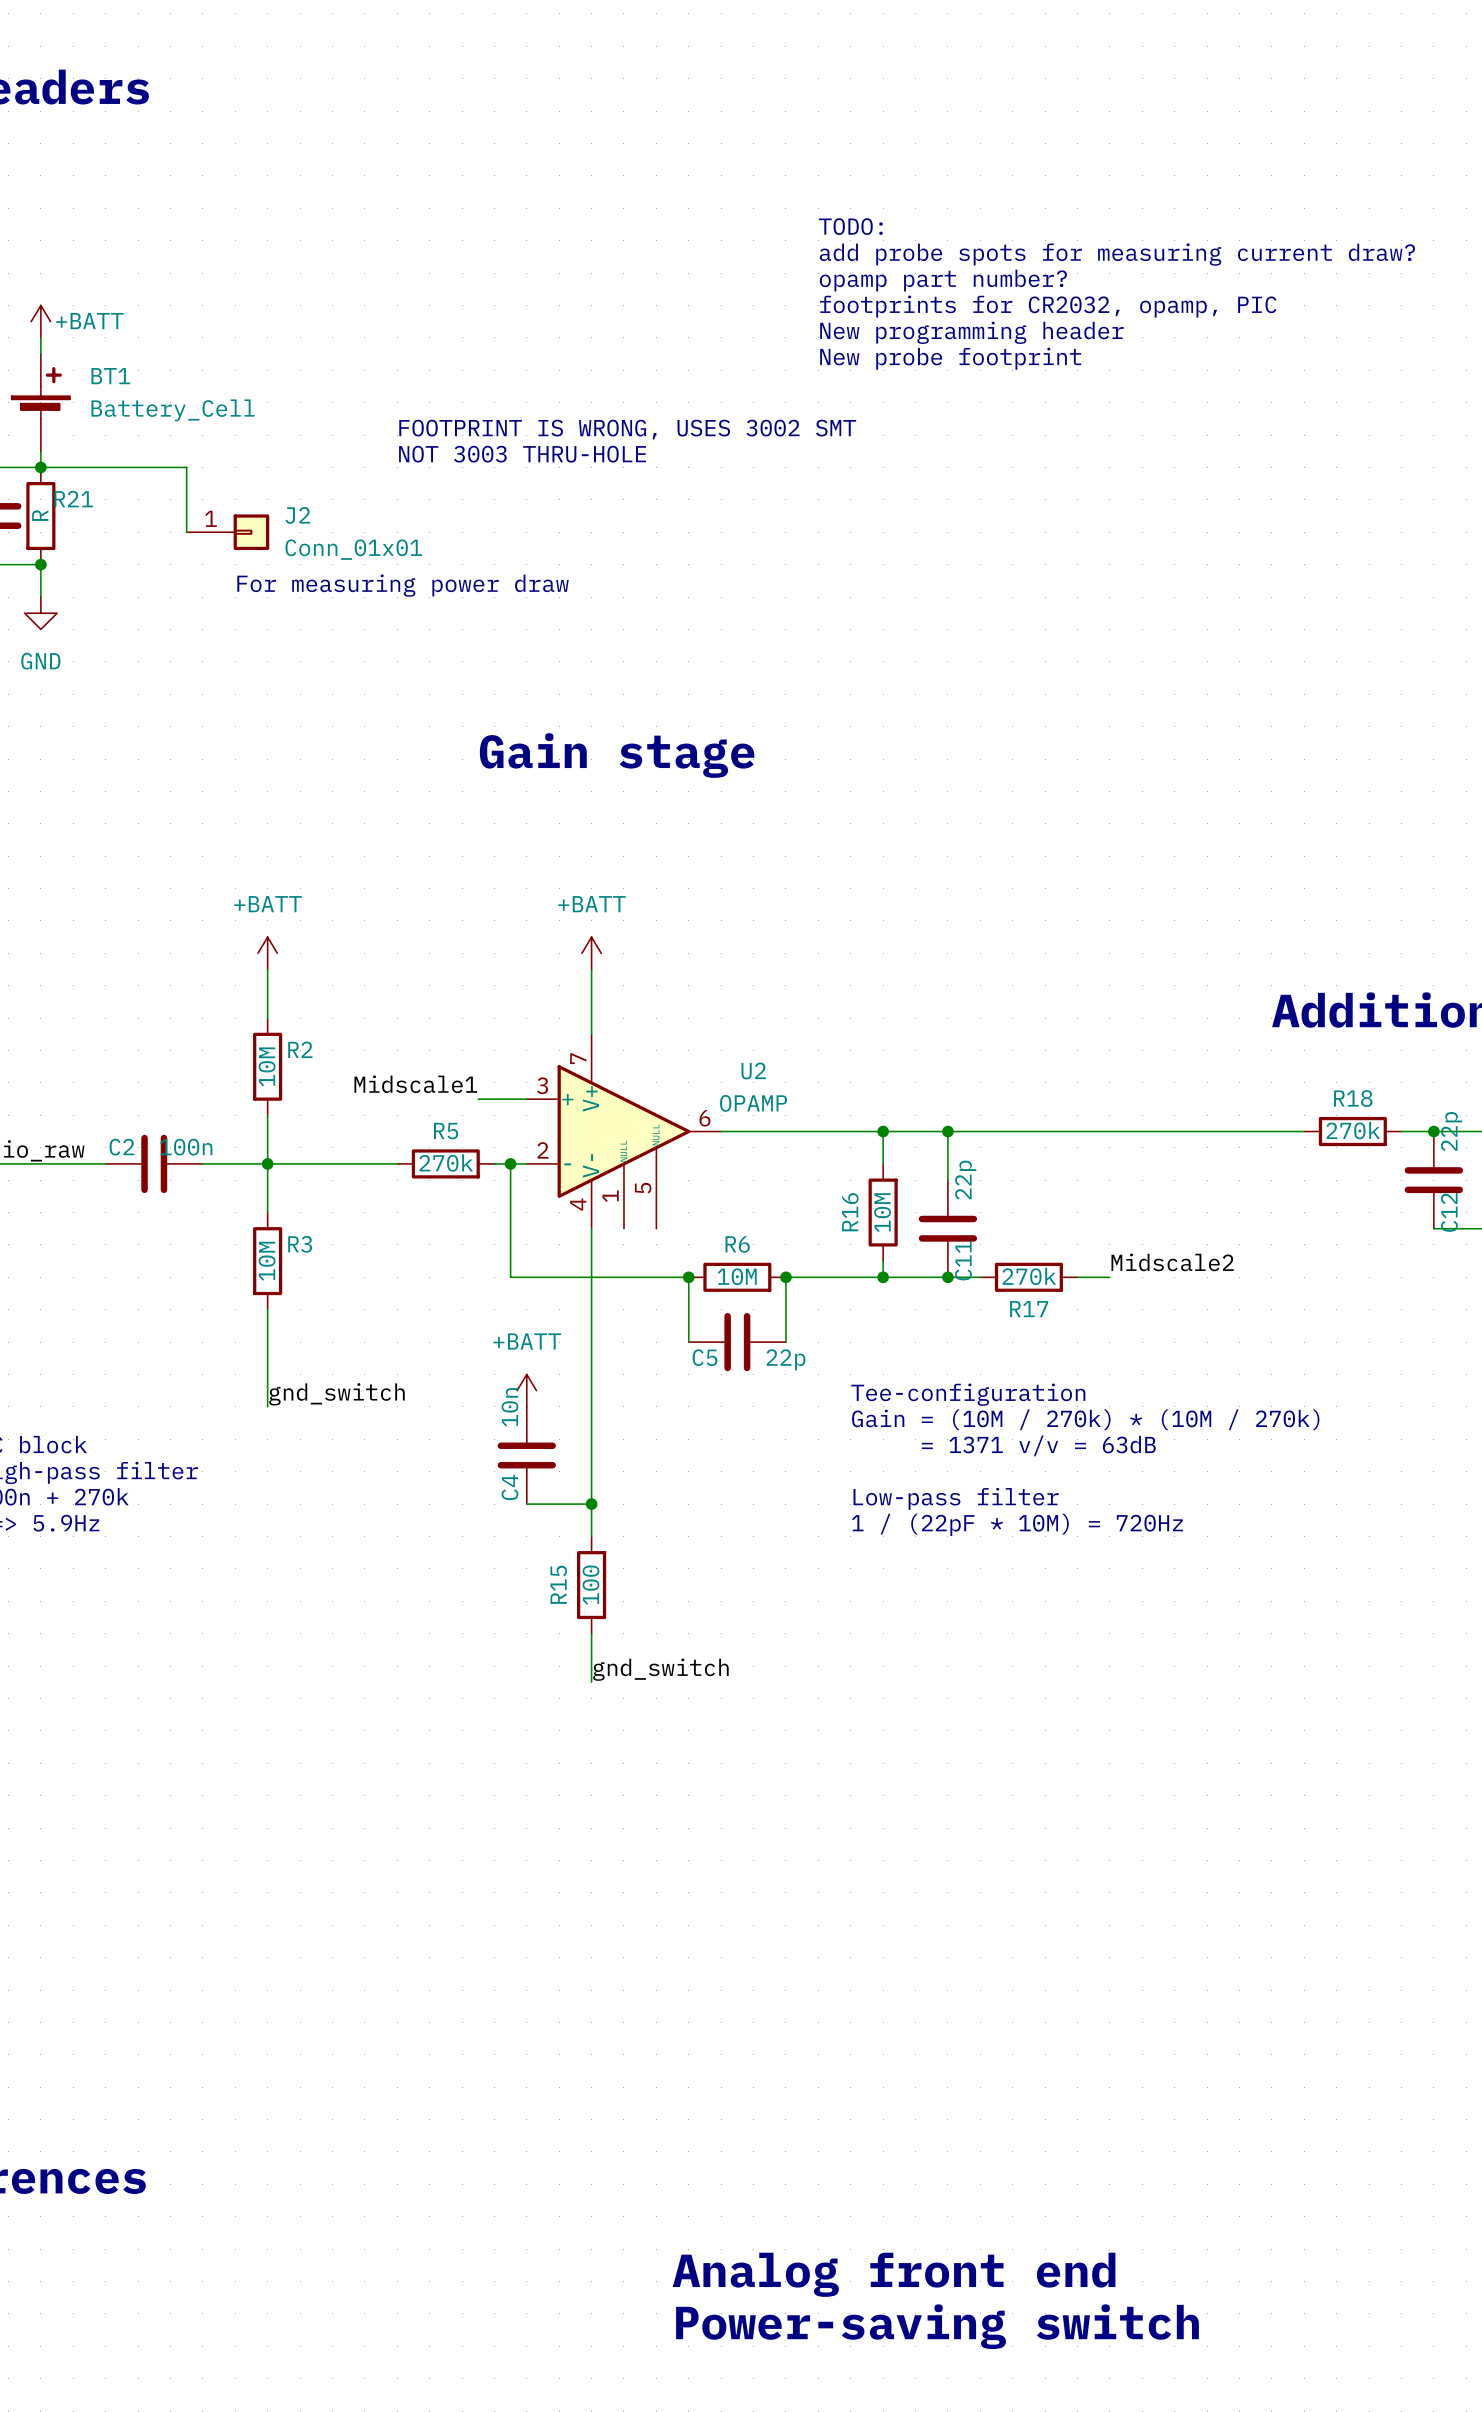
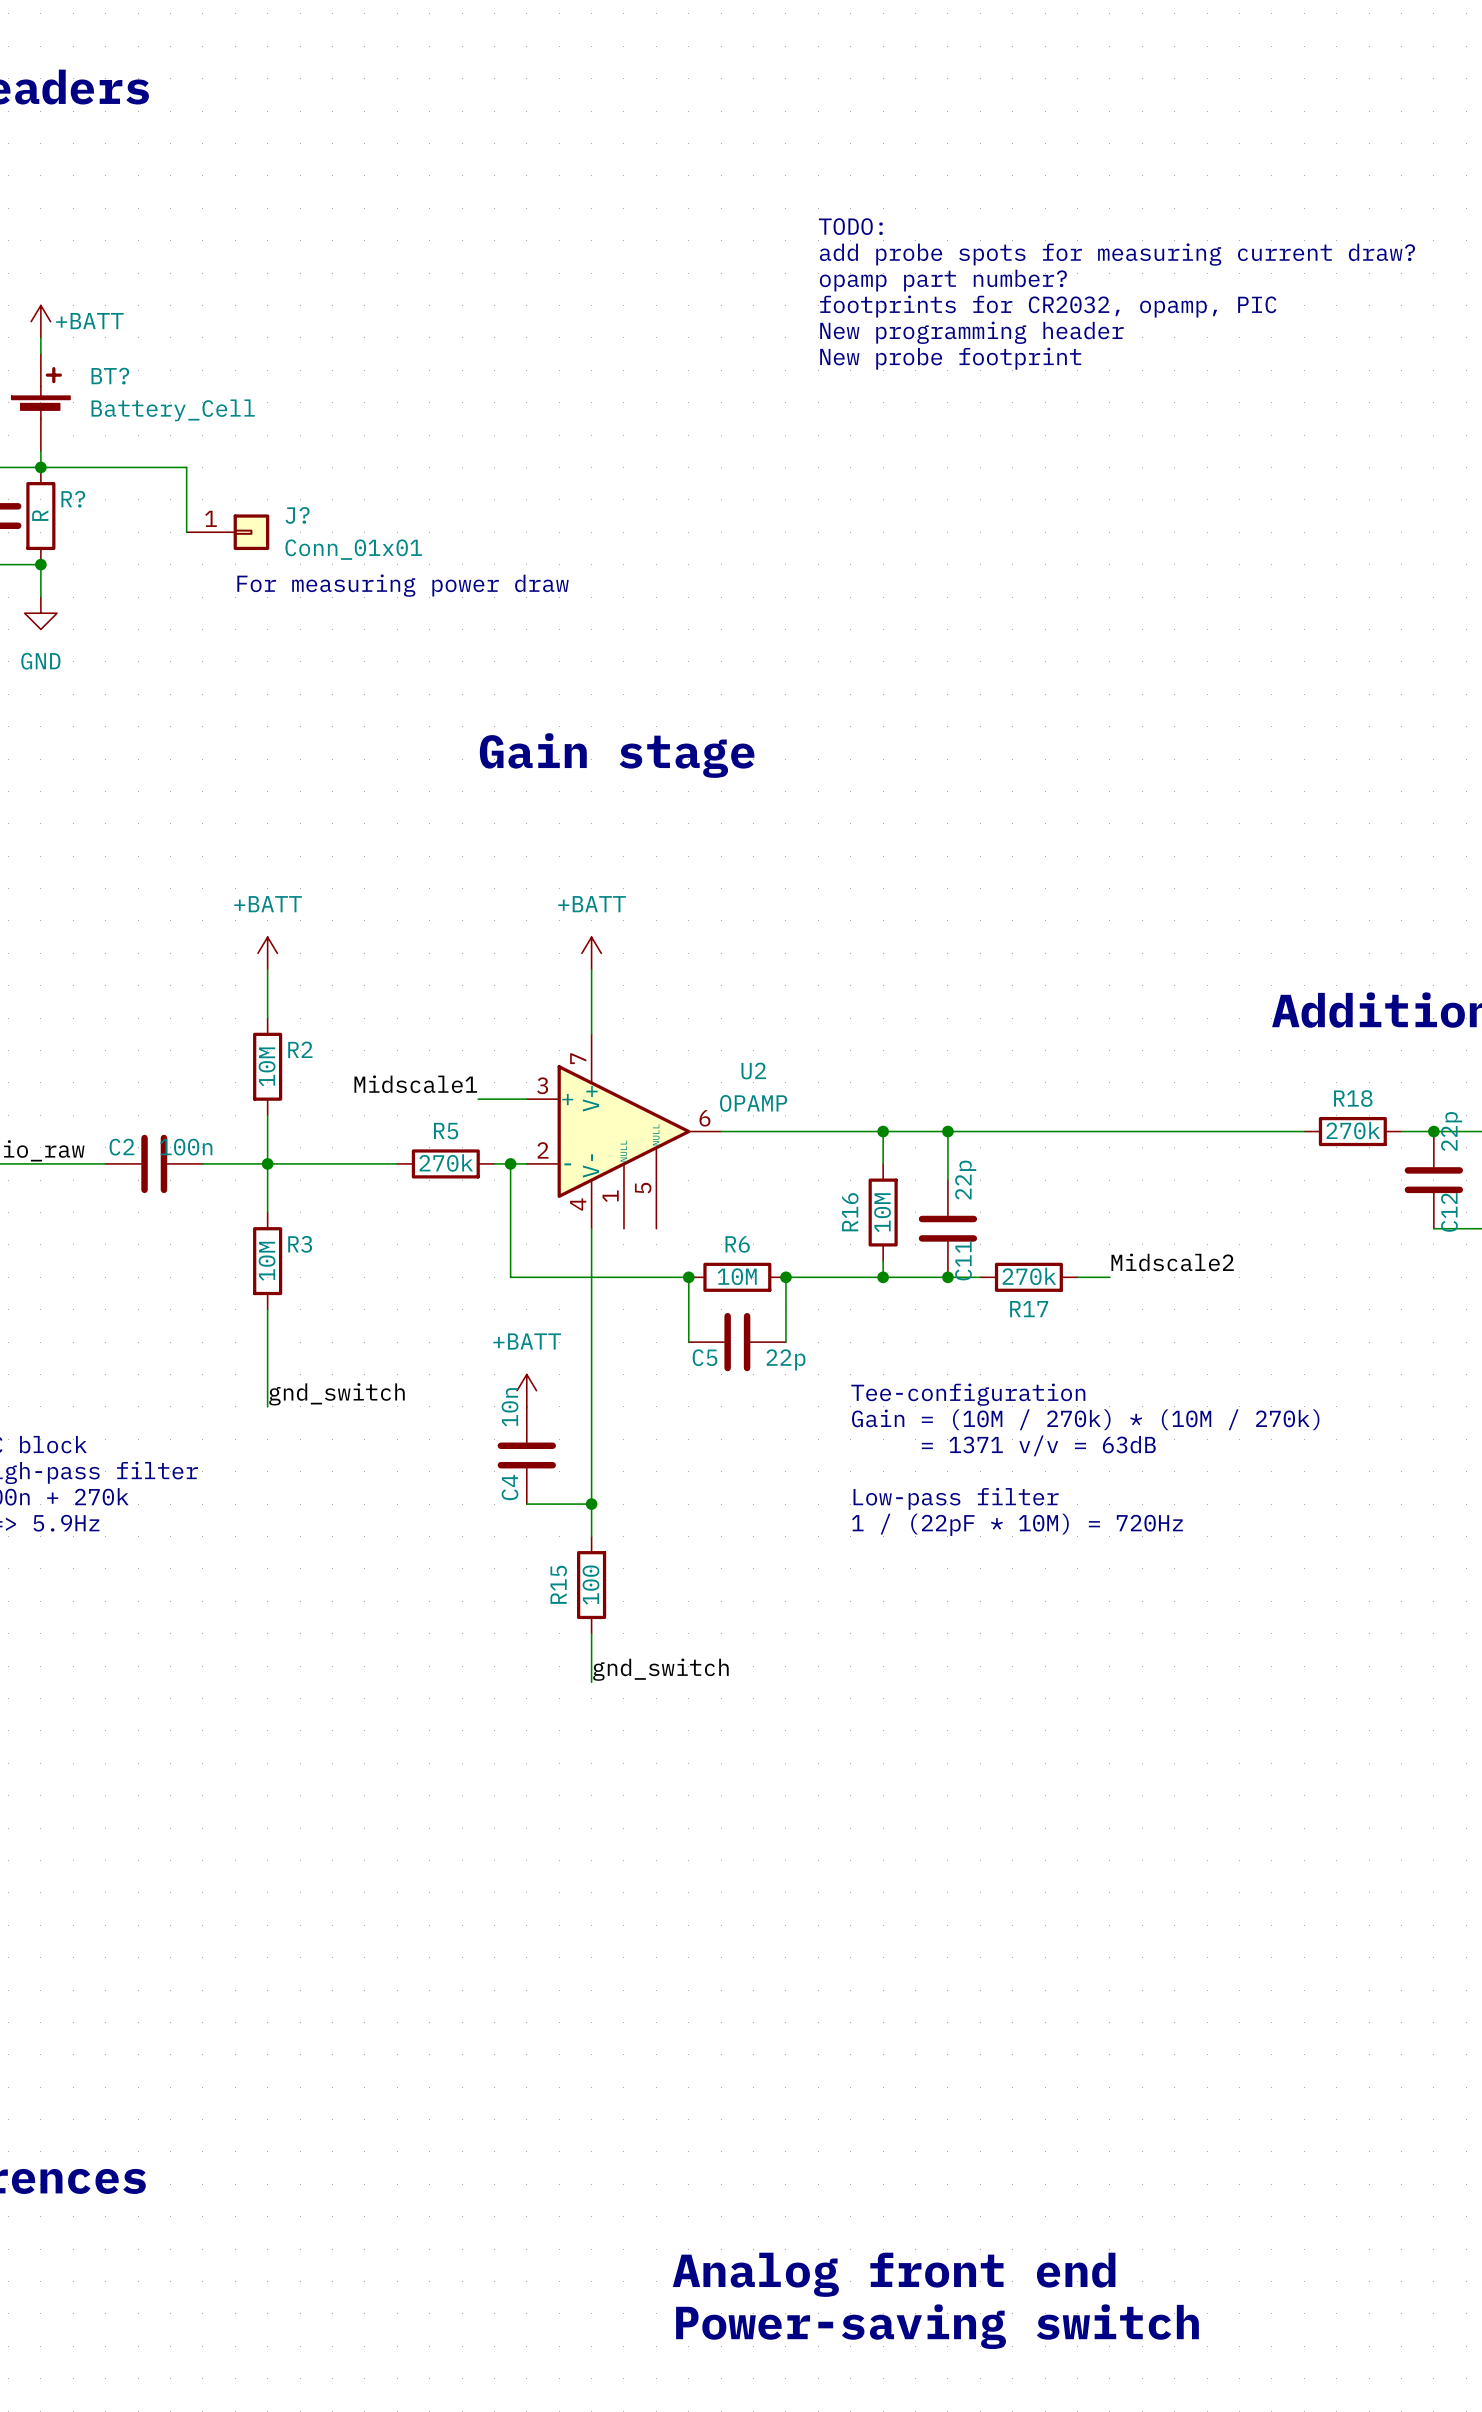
BT1 name: BT1 (110, 376) -> BT? (110, 376)
text: FOOTPRINT IS WRONG, USES 3002 SMT (627, 429) -> none
text: NOT 3003 THRU-HOLE (522, 454) -> none
R21 name: R21 (73, 499) -> R? (73, 499)
J2 name: J2 (297, 515) -> J? (297, 515)

